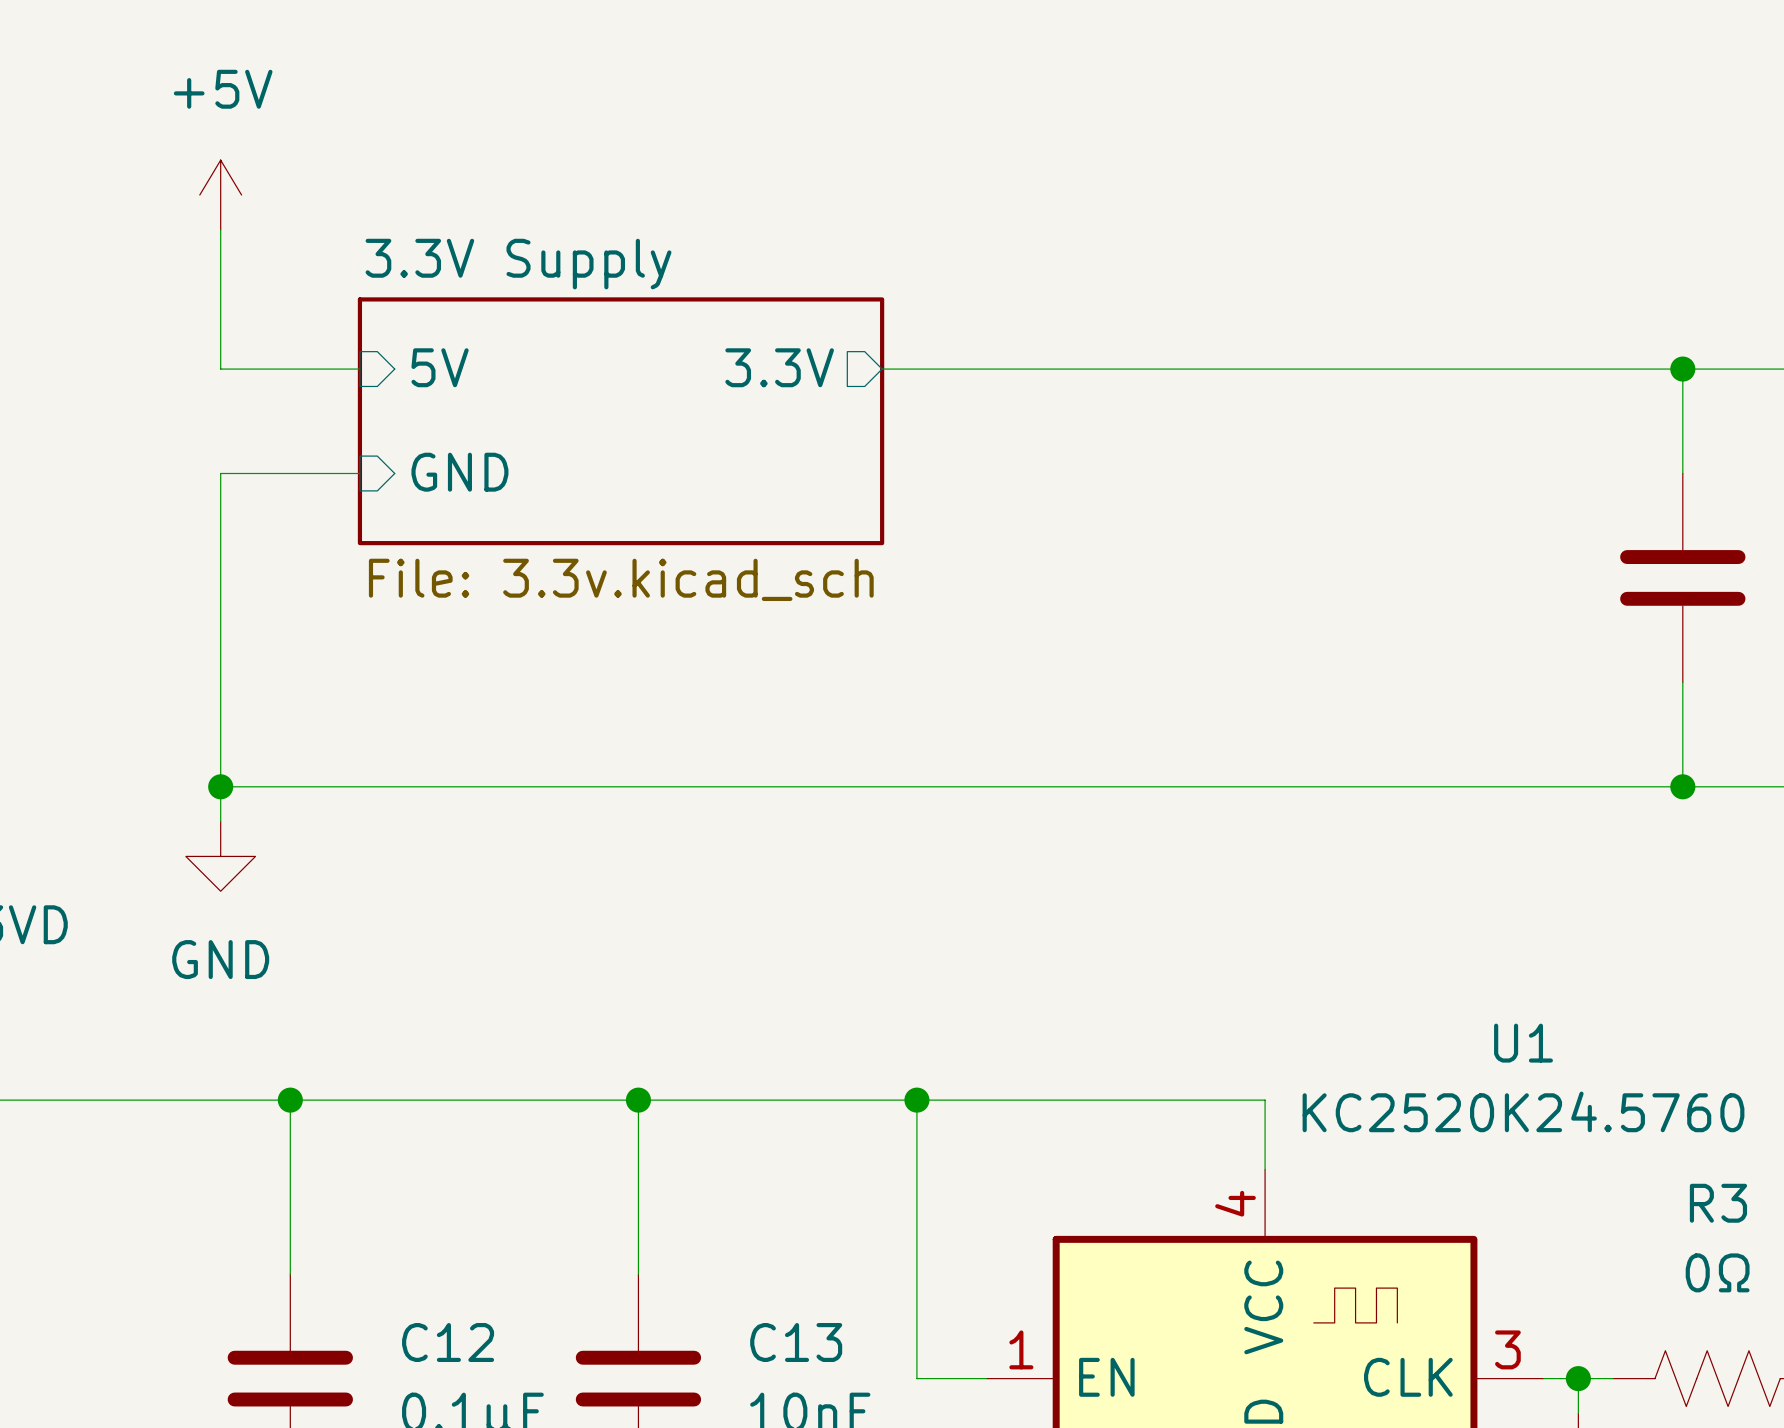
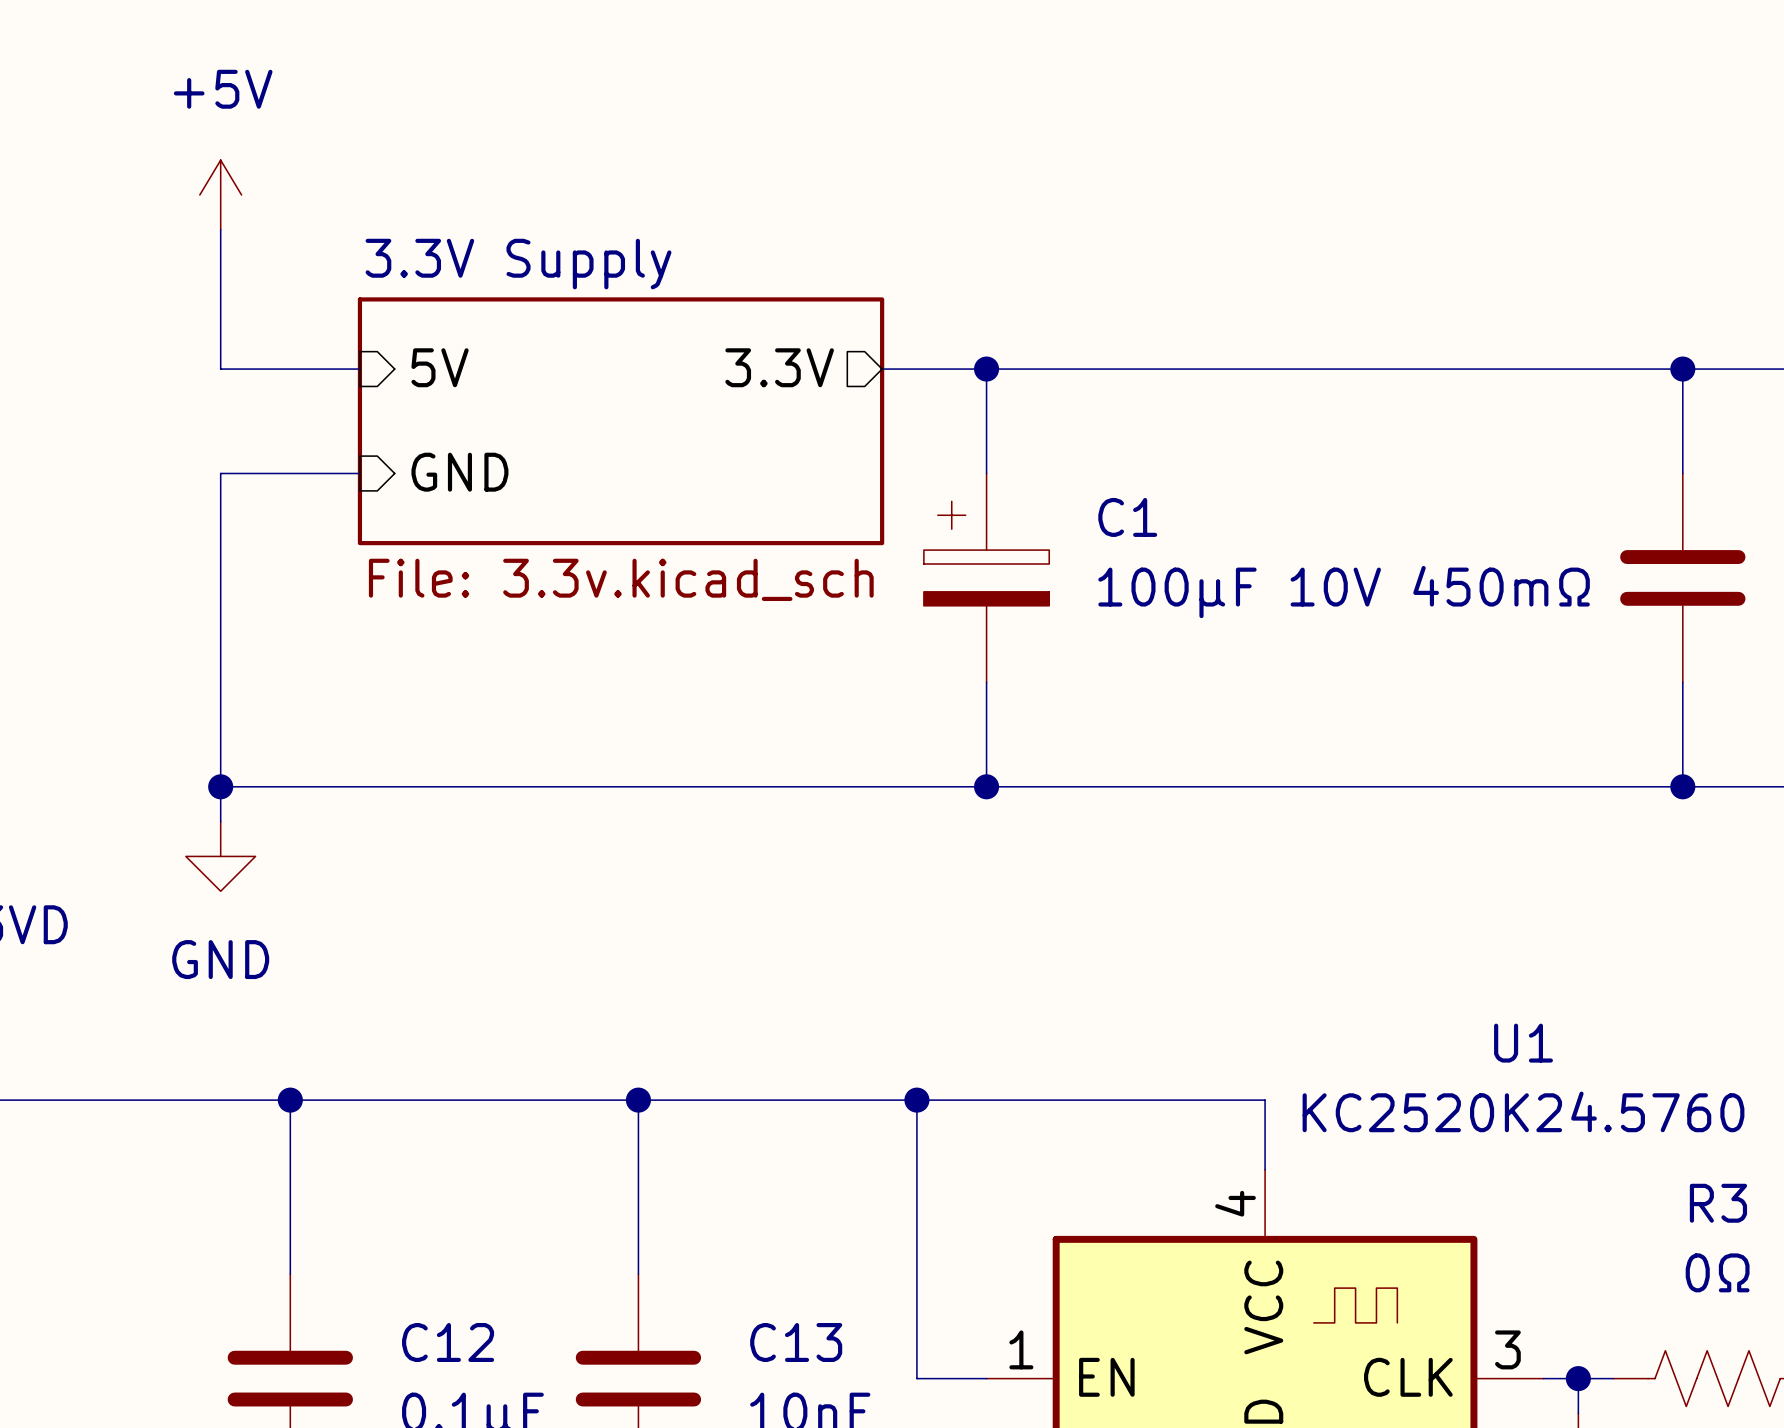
wire: none -> (986, 369) (986, 473)
junction: none -> (986, 369)
C1: none -> 100µF 10V 450mΩ (986, 577)
wire: none -> (986, 682) (986, 786)
junction: none -> (986, 786)

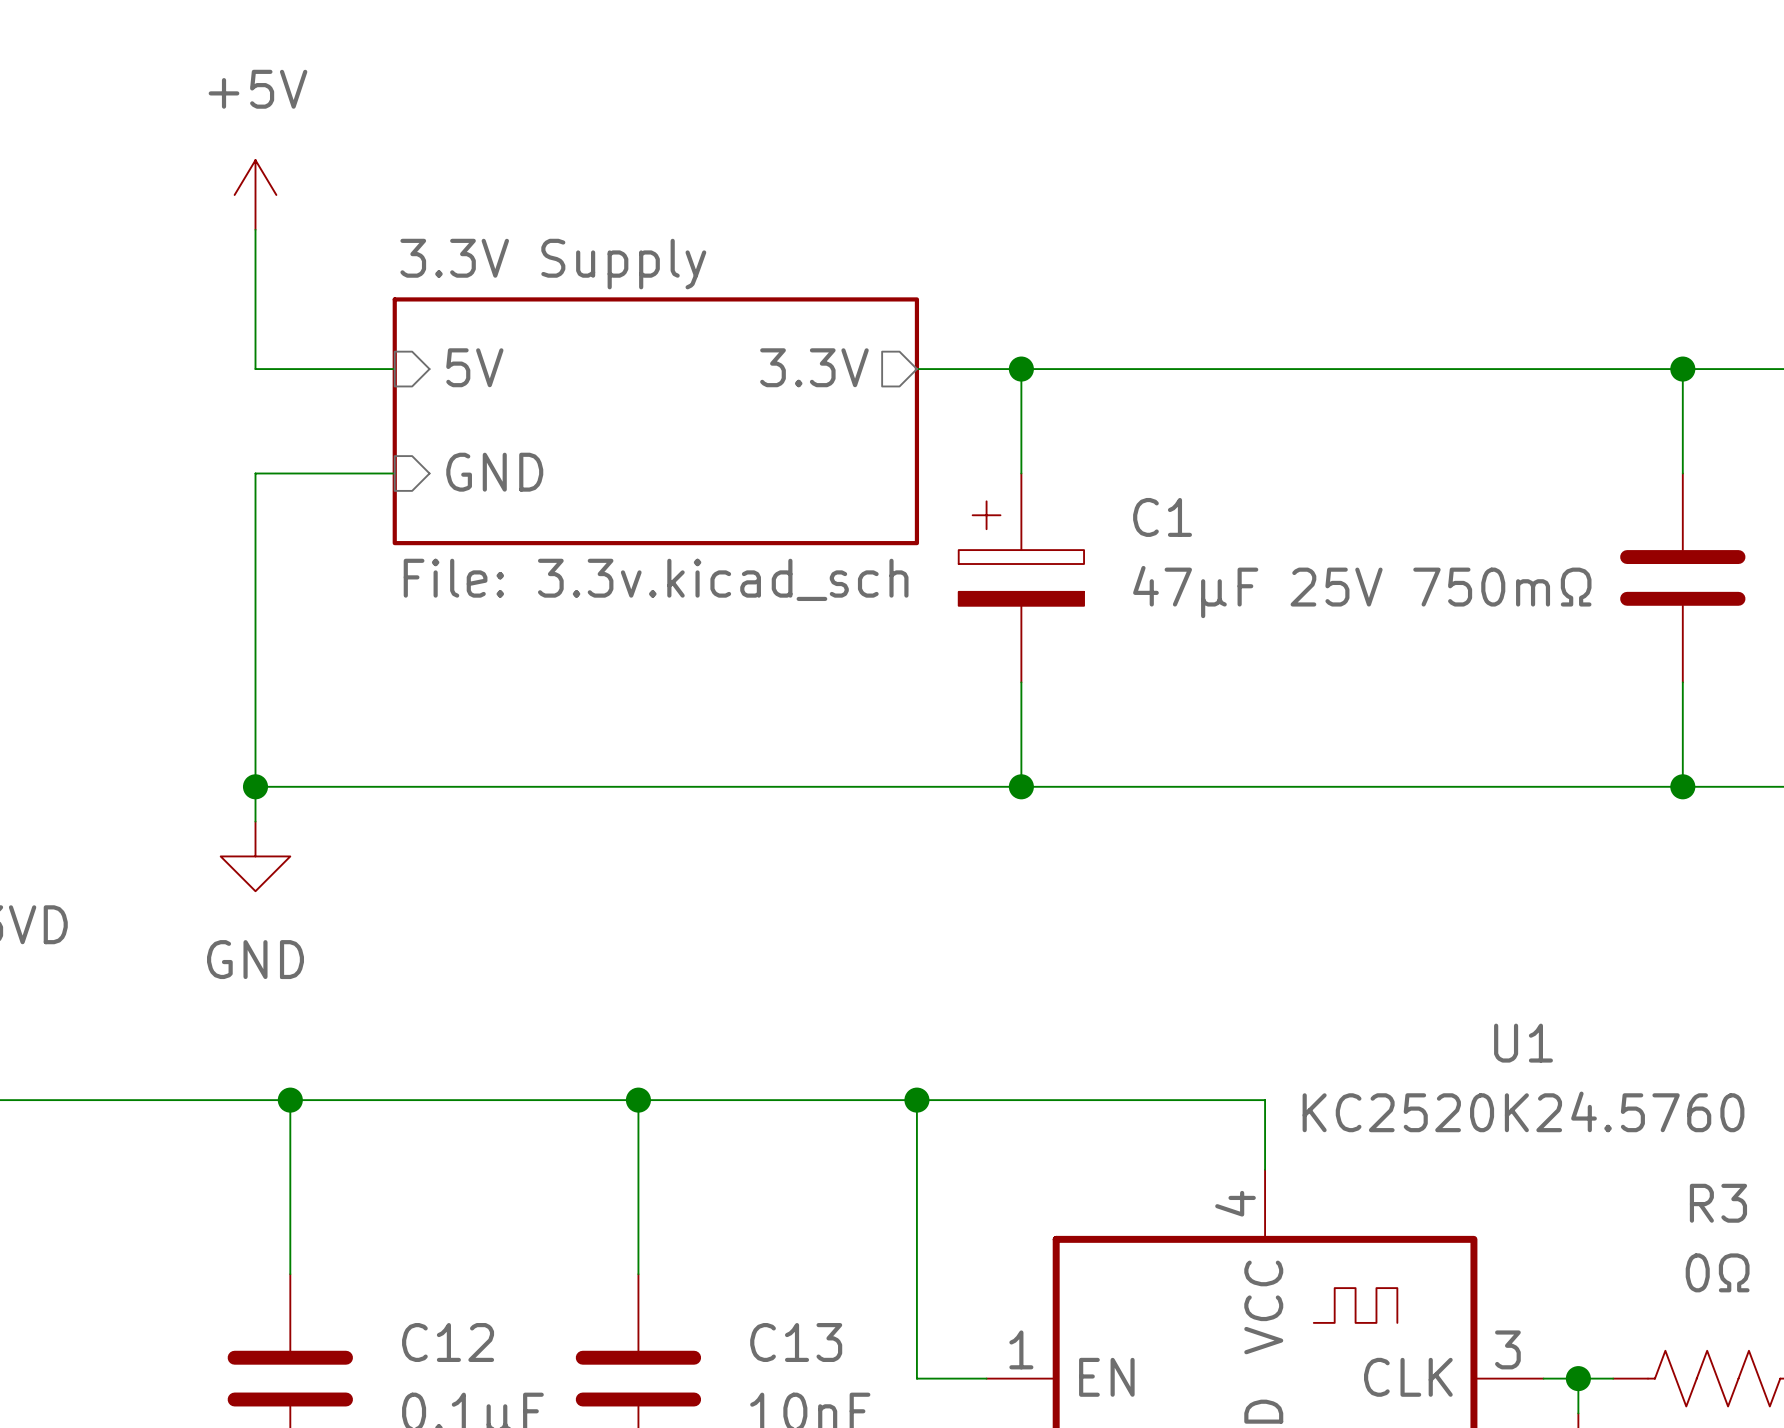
power symbol position: +5V (220, 194) -> +5V (255, 194)
wire: (220, 229) (220, 369) (255, 369) -> (255, 229) (255, 369)
sheet pin position: 5V (440, 367) -> 5V (474, 367)
sheet pin position: 3.3V (779, 367) -> 3.3V (814, 367)
wire: (882, 369) (916, 369) -> (359, 369) (394, 369)
wire: (986, 369) (986, 473) -> (1021, 369) (1021, 473)
junction position: (986, 369) -> (1021, 369)
sheet 3.3V Supply position: (621, 421) -> (655, 421)
sheet pin position: GND (459, 472) -> GND (494, 472)
wire: (255, 473) (220, 473) (220, 821) -> (255, 473) (255, 821)
C1 position: (986, 577) -> (1021, 577)
C1 value: 100µF 10V 450mΩ (1344, 592) -> 47µF 25V 750mΩ (1362, 592)
wire: (986, 682) (986, 786) -> (1021, 682) (1021, 786)
wire: (220, 786) (255, 786) -> (359, 473) (394, 473)
junction position: (220, 786) -> (255, 786)
junction position: (986, 786) -> (1021, 786)
power symbol position: GND (220, 856) -> GND (255, 856)

